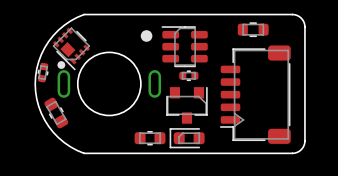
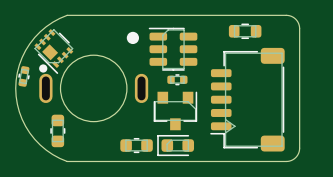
part: (56, 112) -> none
part: none -> (57, 130)

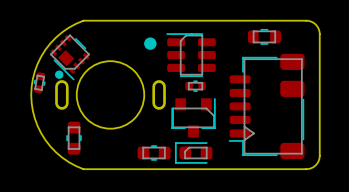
part footprint: [210, 47, 285, 152] -> [228, 53, 305, 160]

